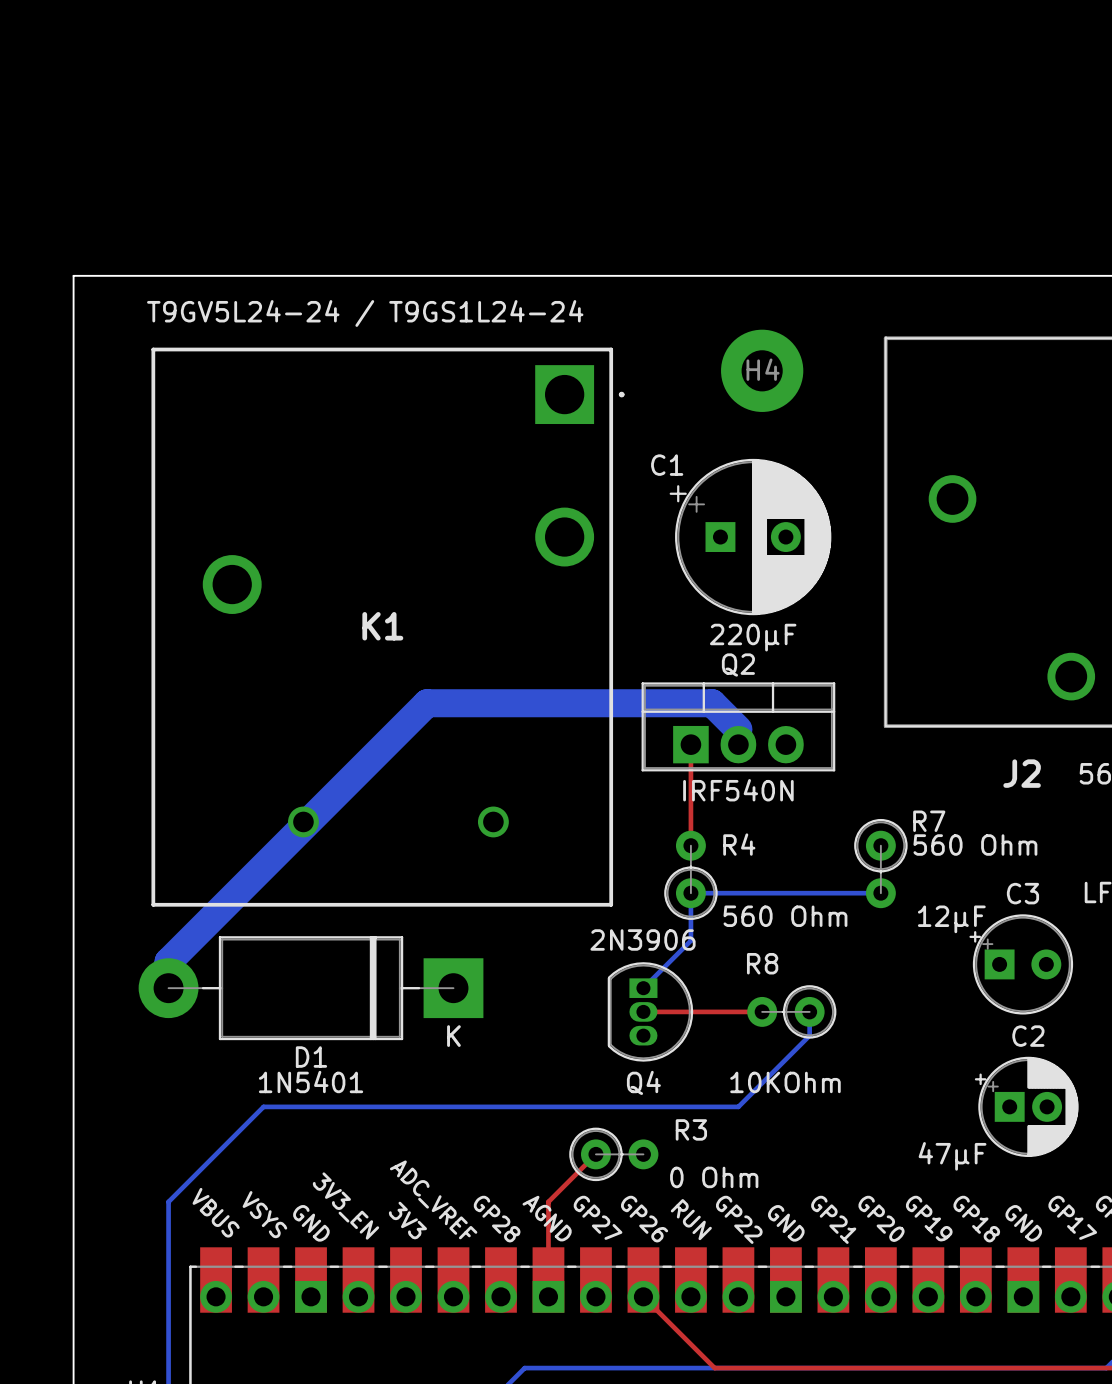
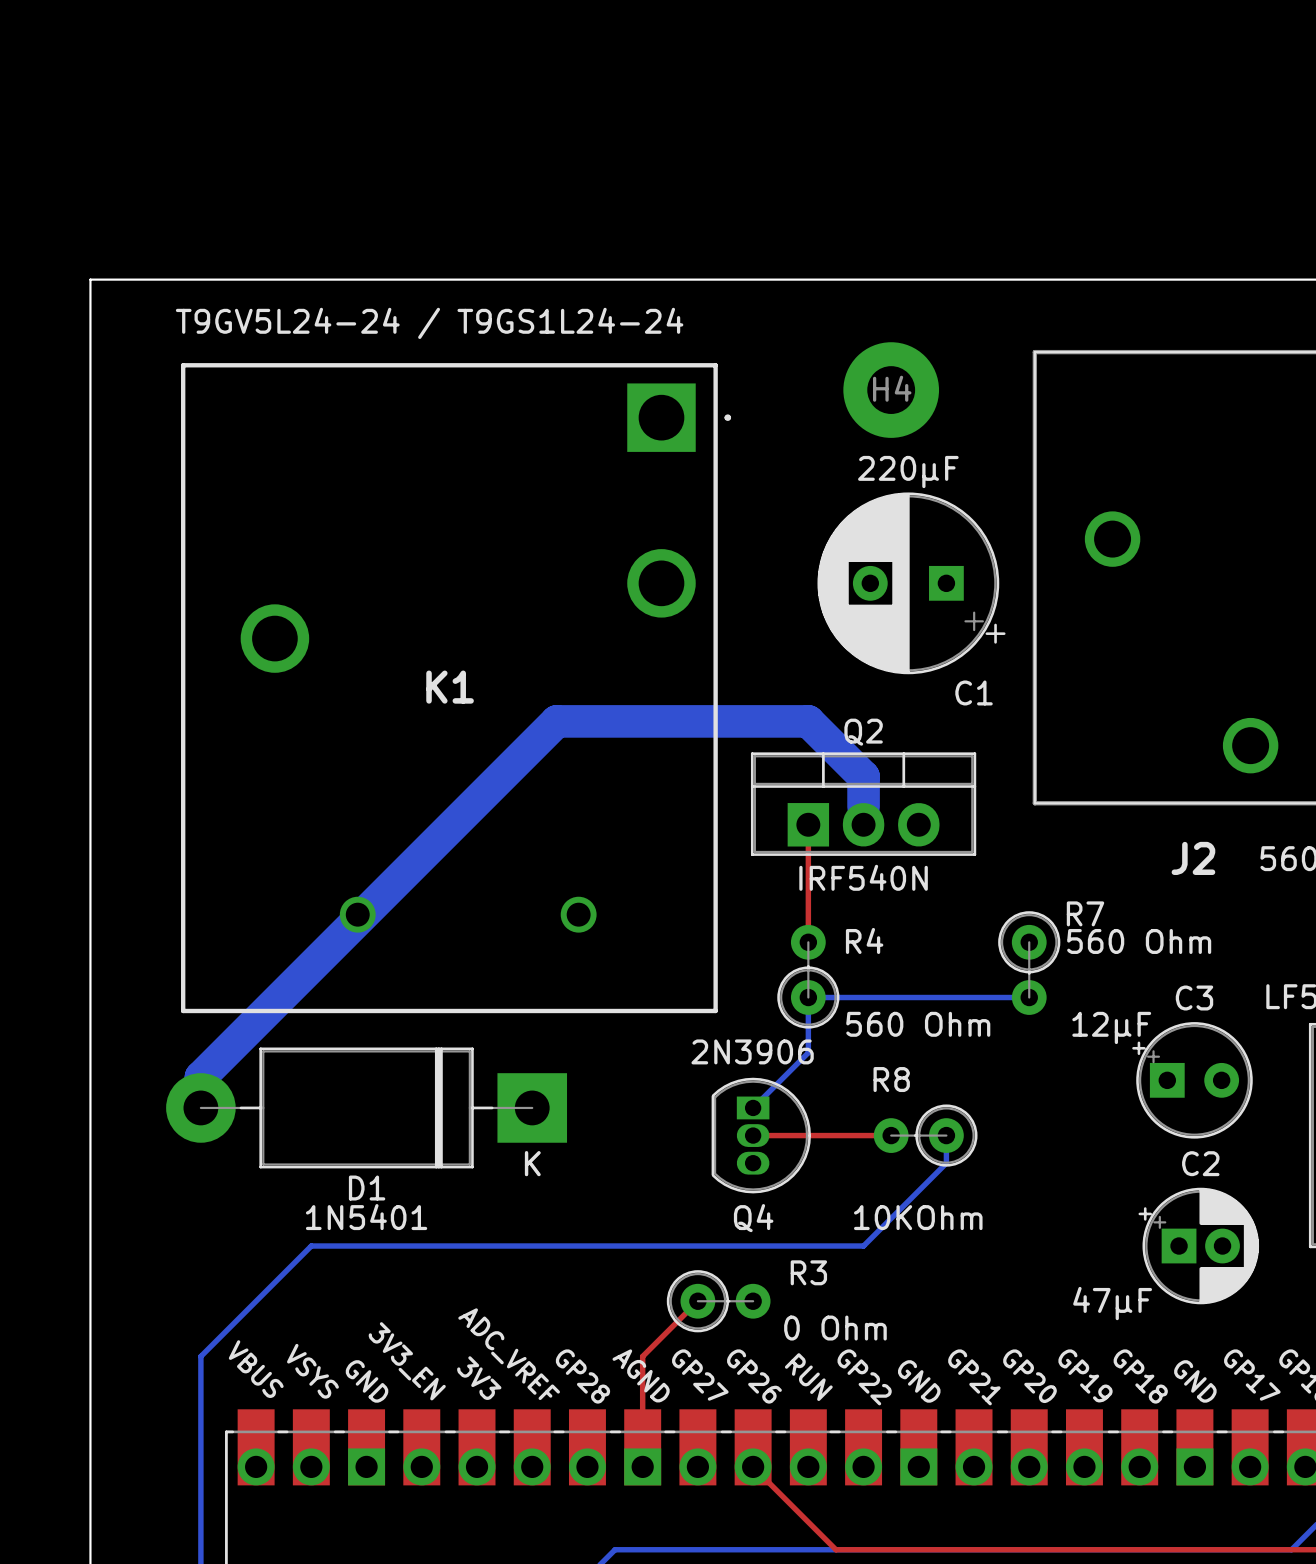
C1 name position: C1 (667, 465) -> C1 (974, 692)
C1 rotation: 0° (750, 537) -> 180° (911, 583)
bottom track: (427, 703) (712, 703) (738, 729) -> (501, 776) (556, 721) (808, 721) (863, 776) (863, 807)

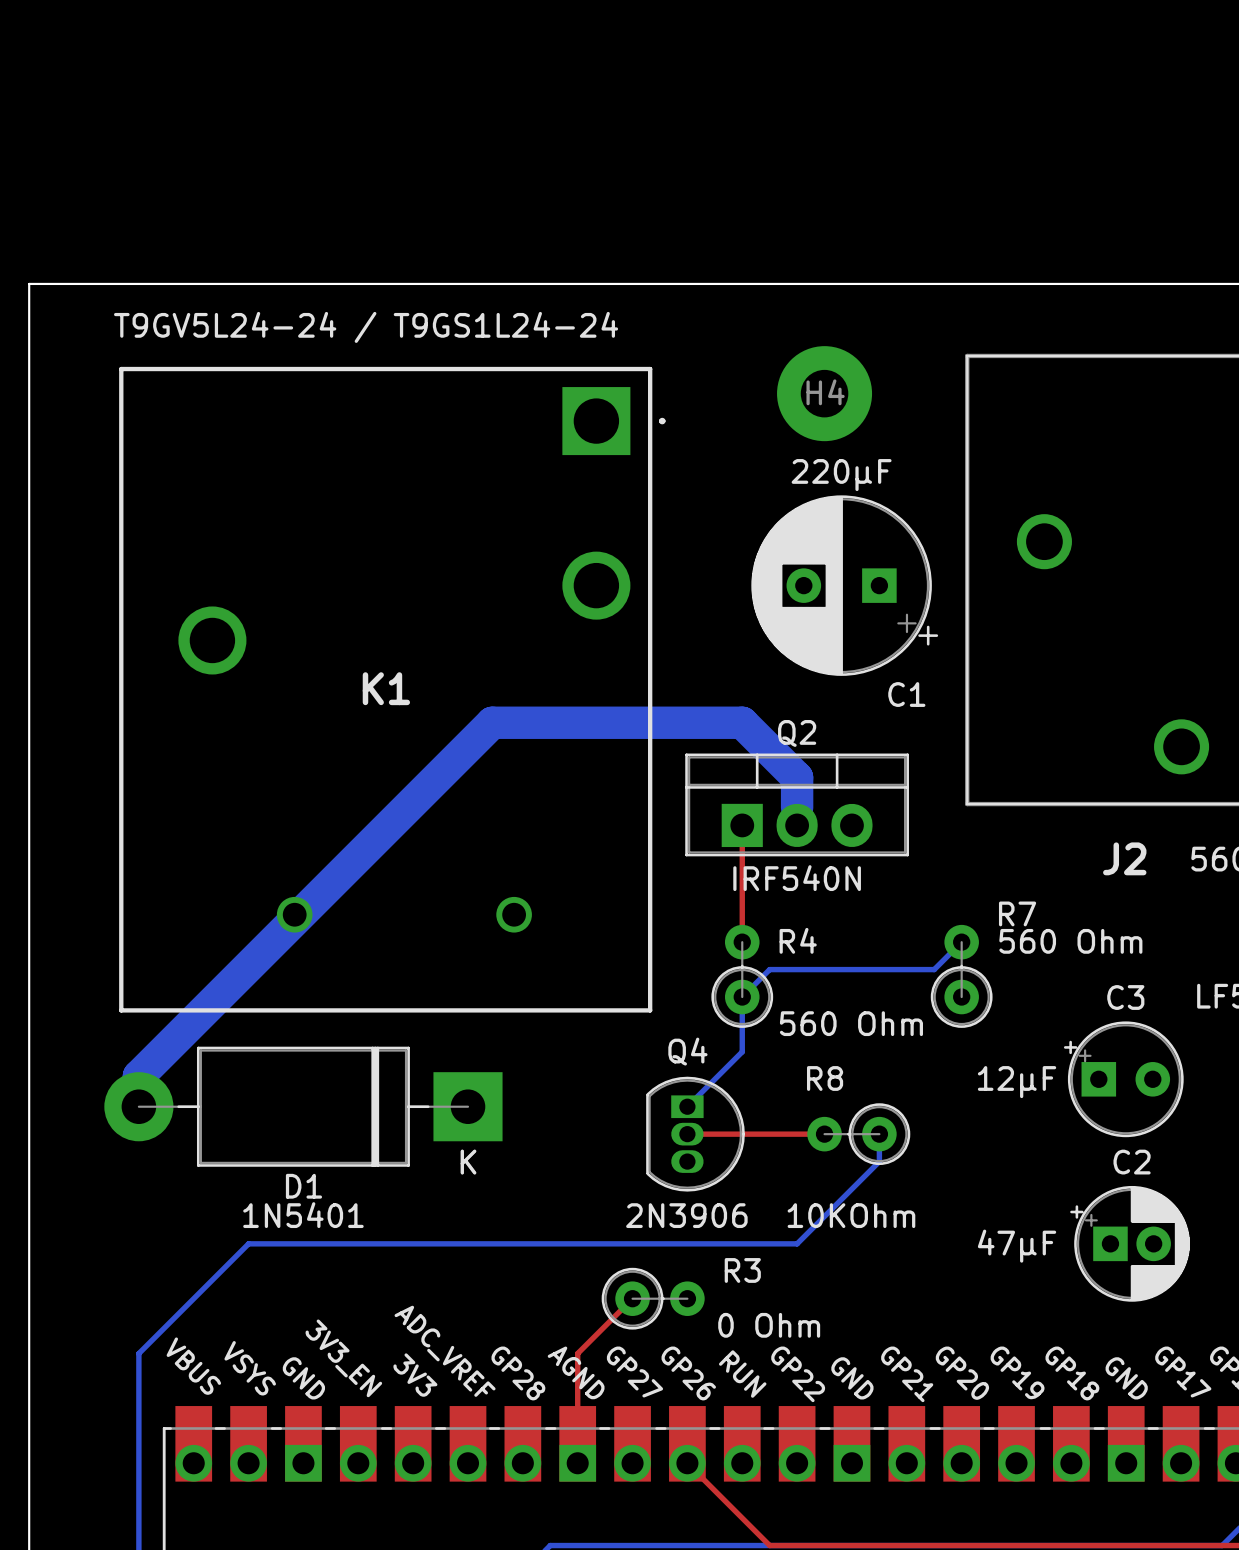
R7 rotation: 0° (1029, 963) -> 180° (961, 976)
bottom track: (808, 997) (1029, 997) -> (742, 997) (769, 969) (934, 969) (961, 942)
C3 value position: 12µF (1111, 1027) -> 12µF (1017, 1082)
Q4 value position: 2N3906 (752, 1051) -> 2N3906 (686, 1215)
Q4 name position: Q4 (753, 1218) -> Q4 (687, 1051)
C2 value position: 47µF (1112, 1303) -> 47µF (1017, 1246)

